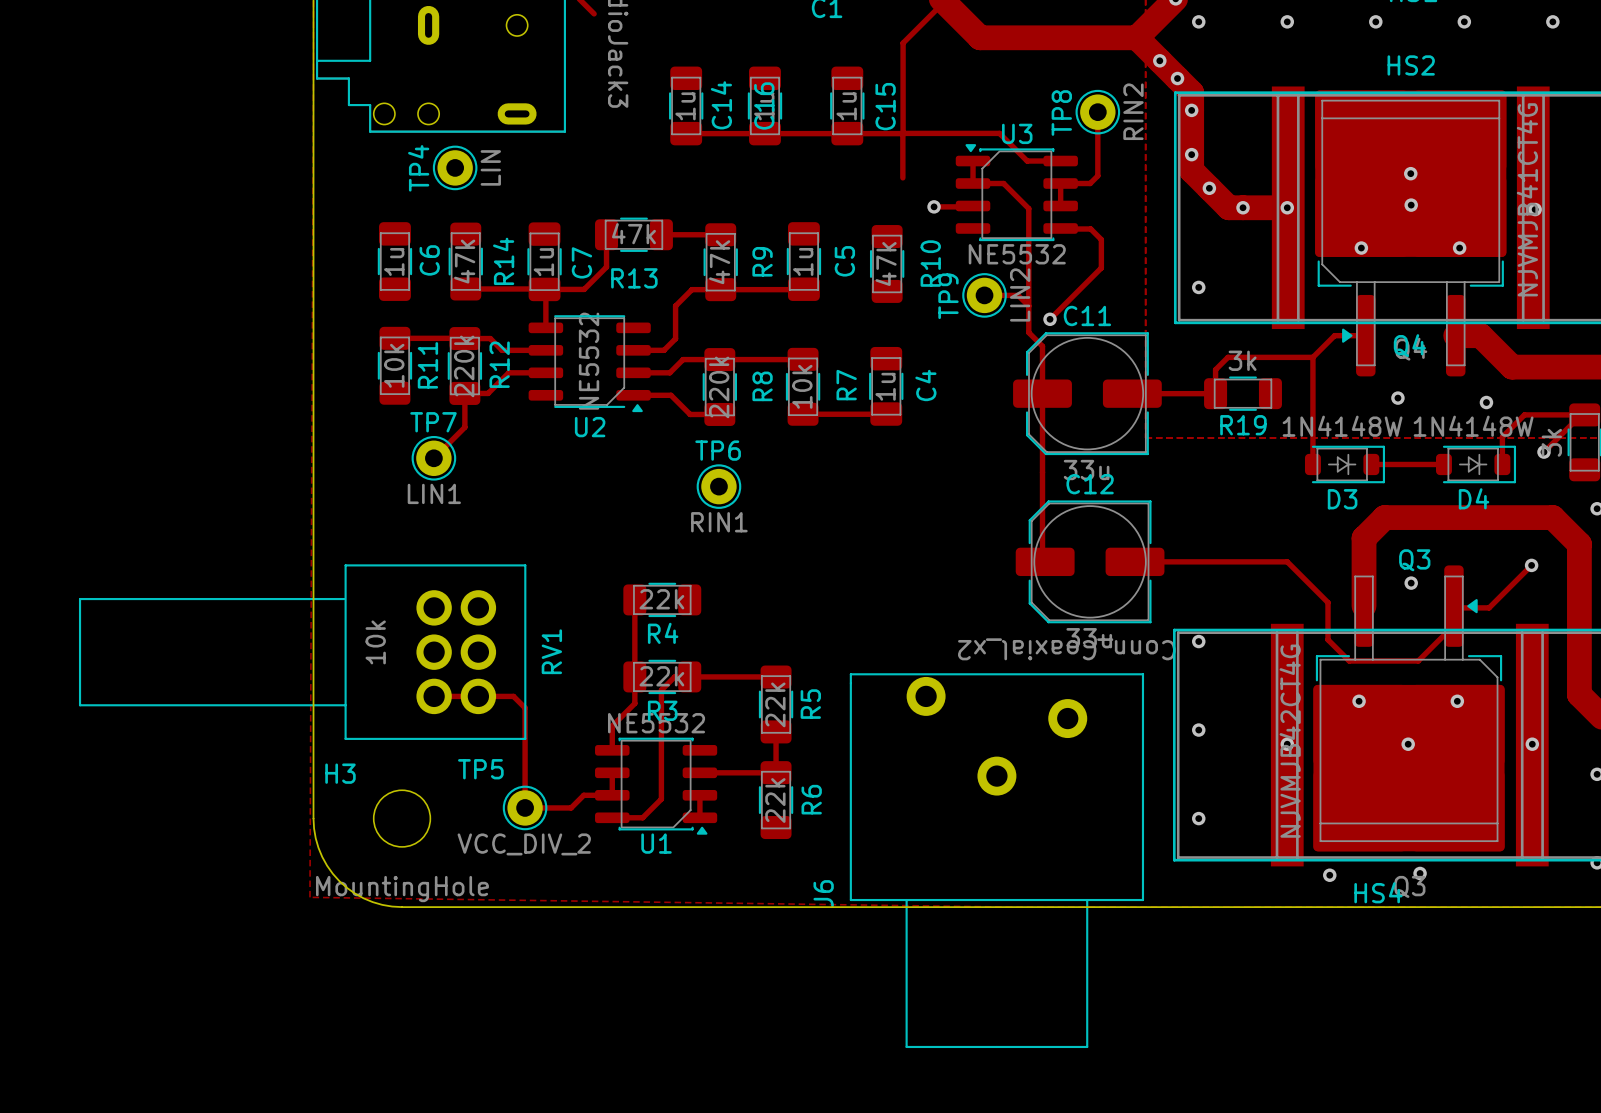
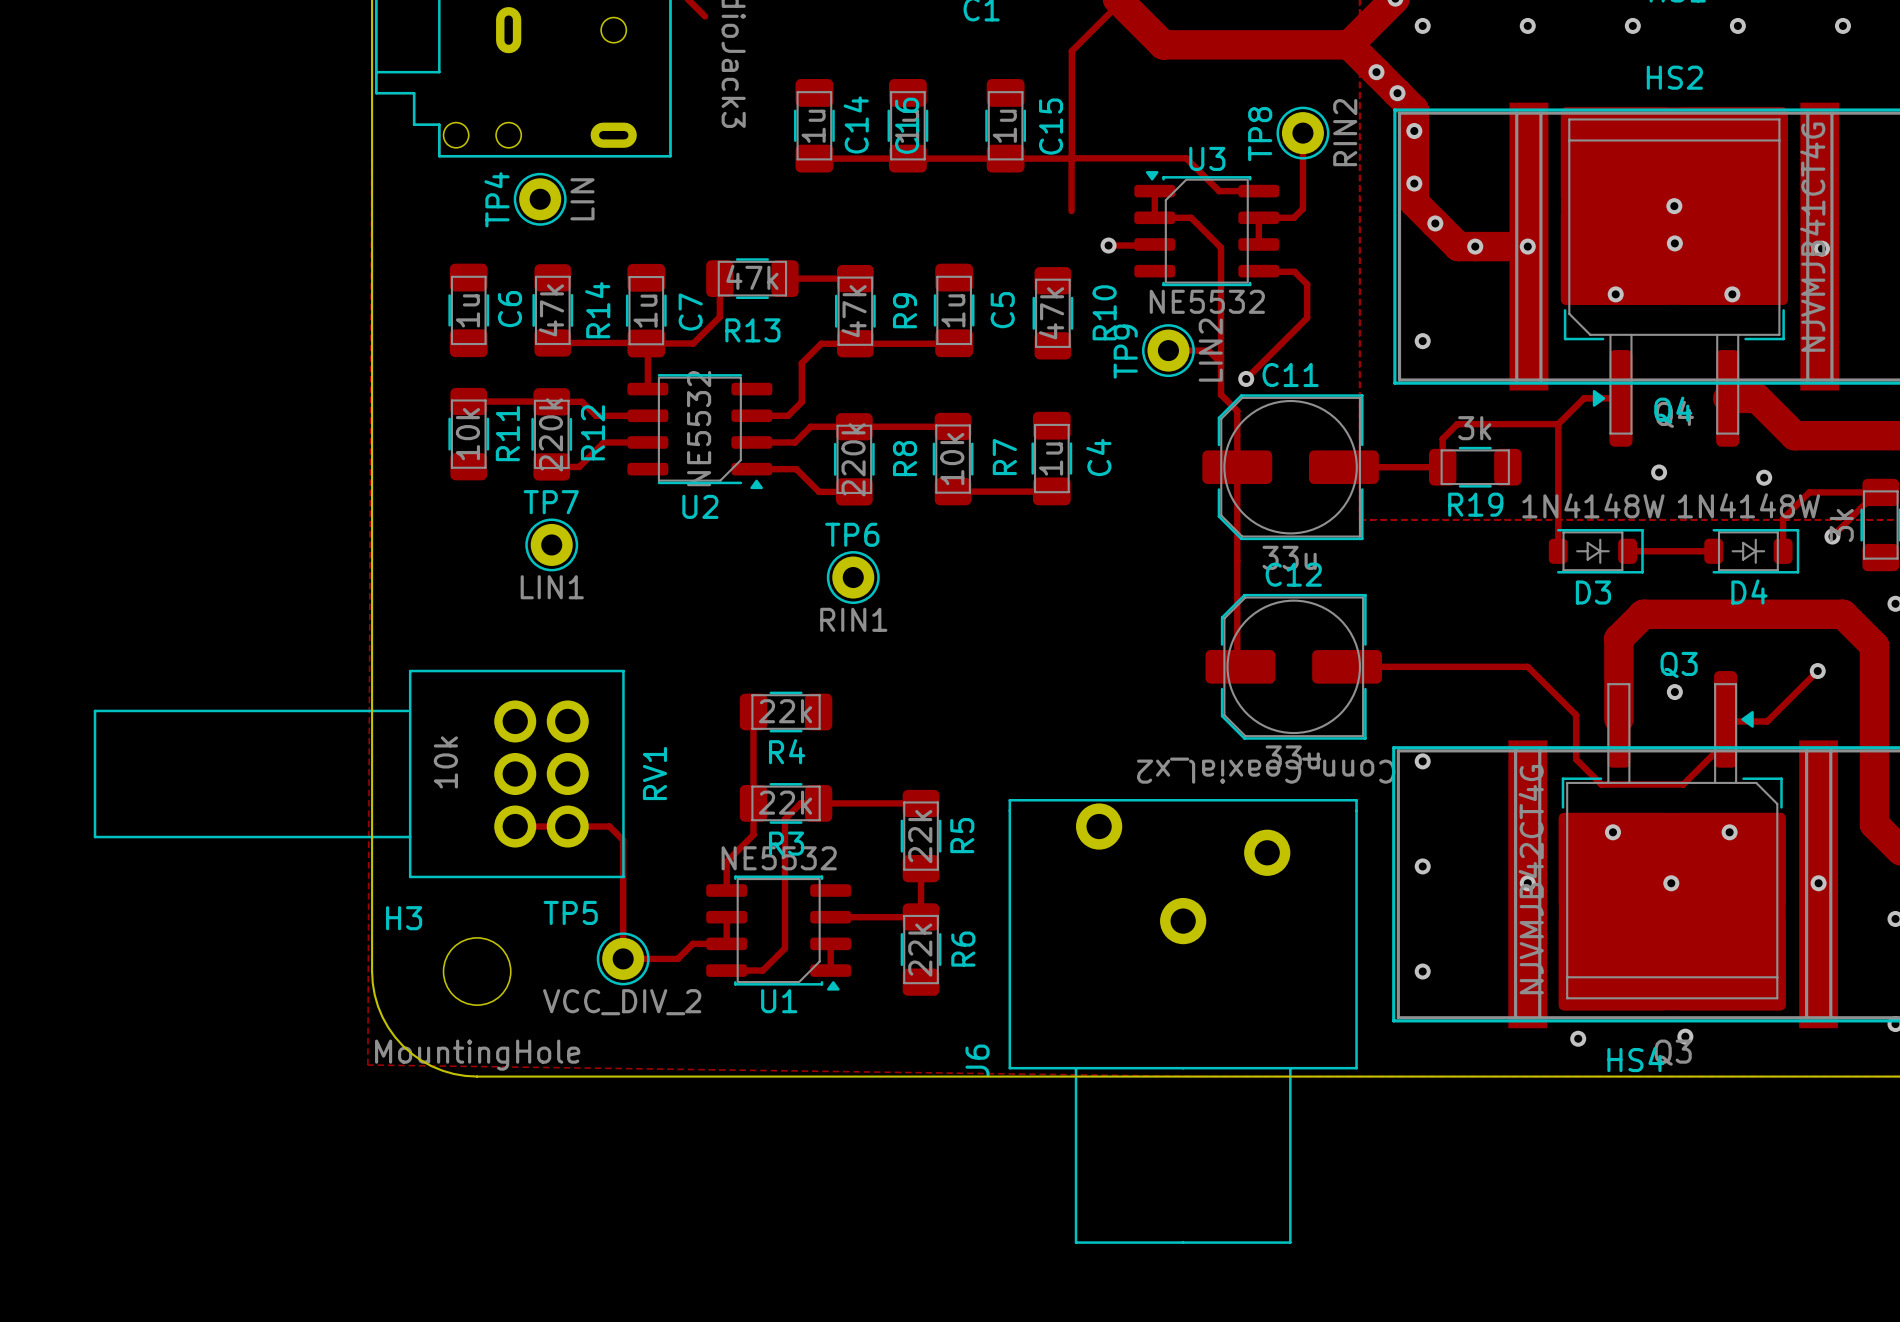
track: (464, 393) (464, 427) (433, 458) -> none
TP7 position: (433, 458) -> (551, 544)

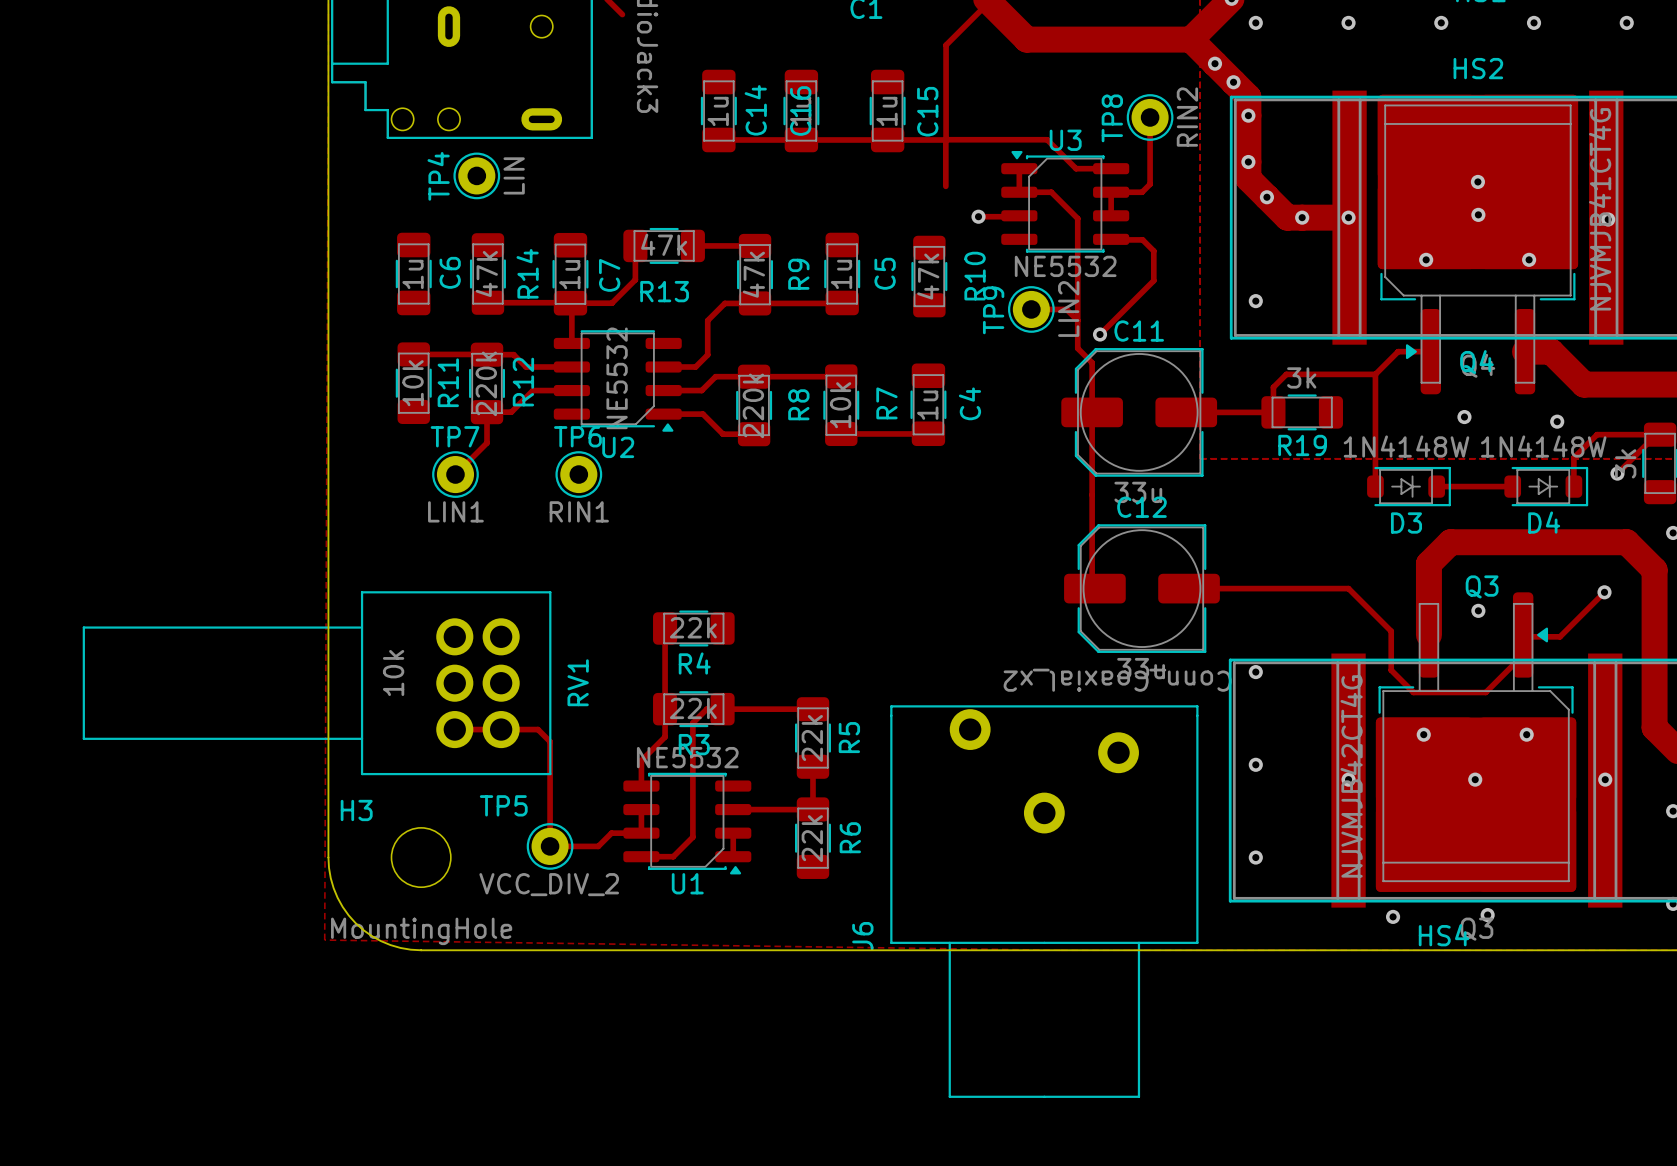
track: none -> (487, 412) (487, 443) (455, 474)
TP7 position: (551, 544) -> (455, 474)
TP6 position: (853, 577) -> (578, 474)

